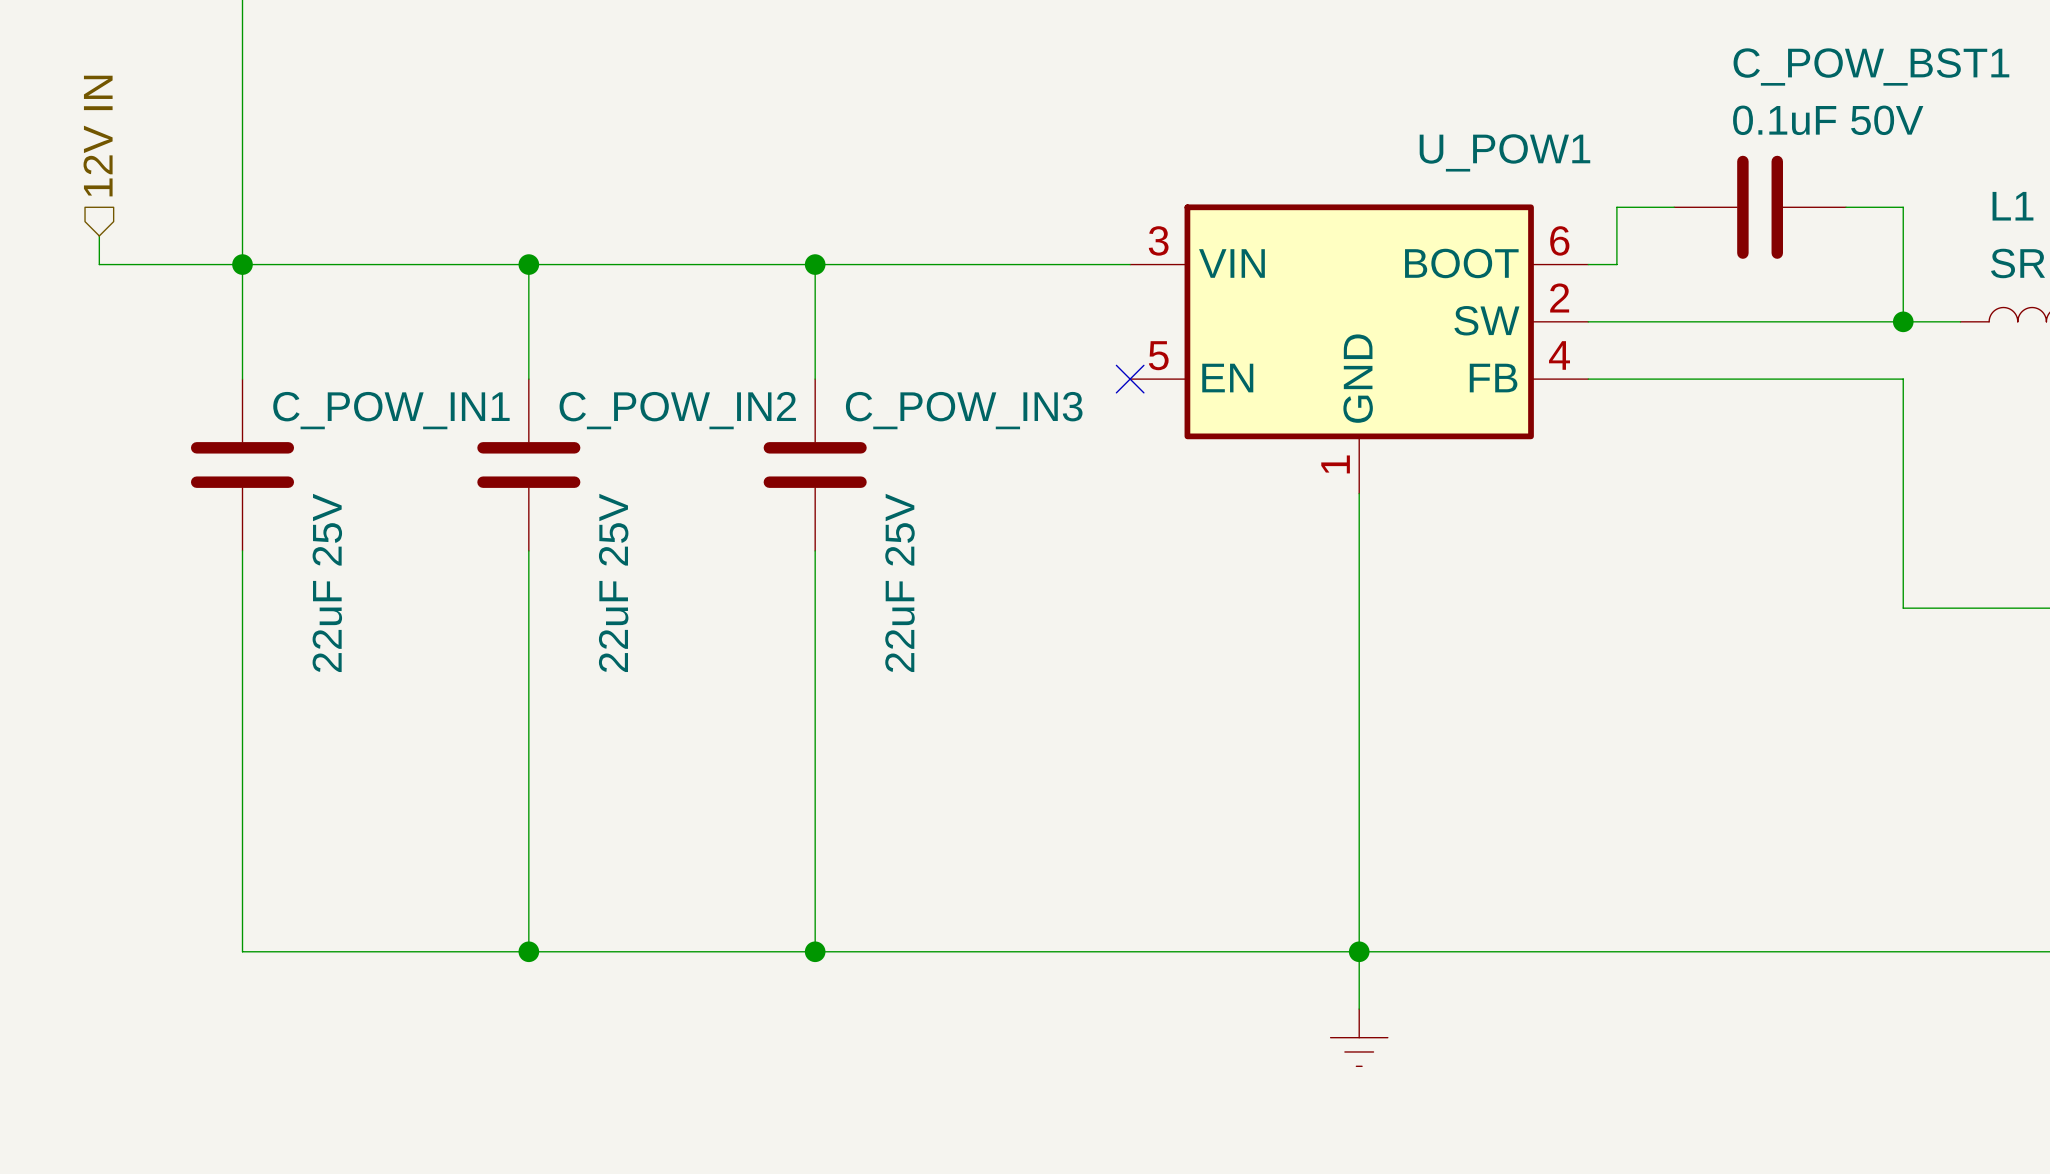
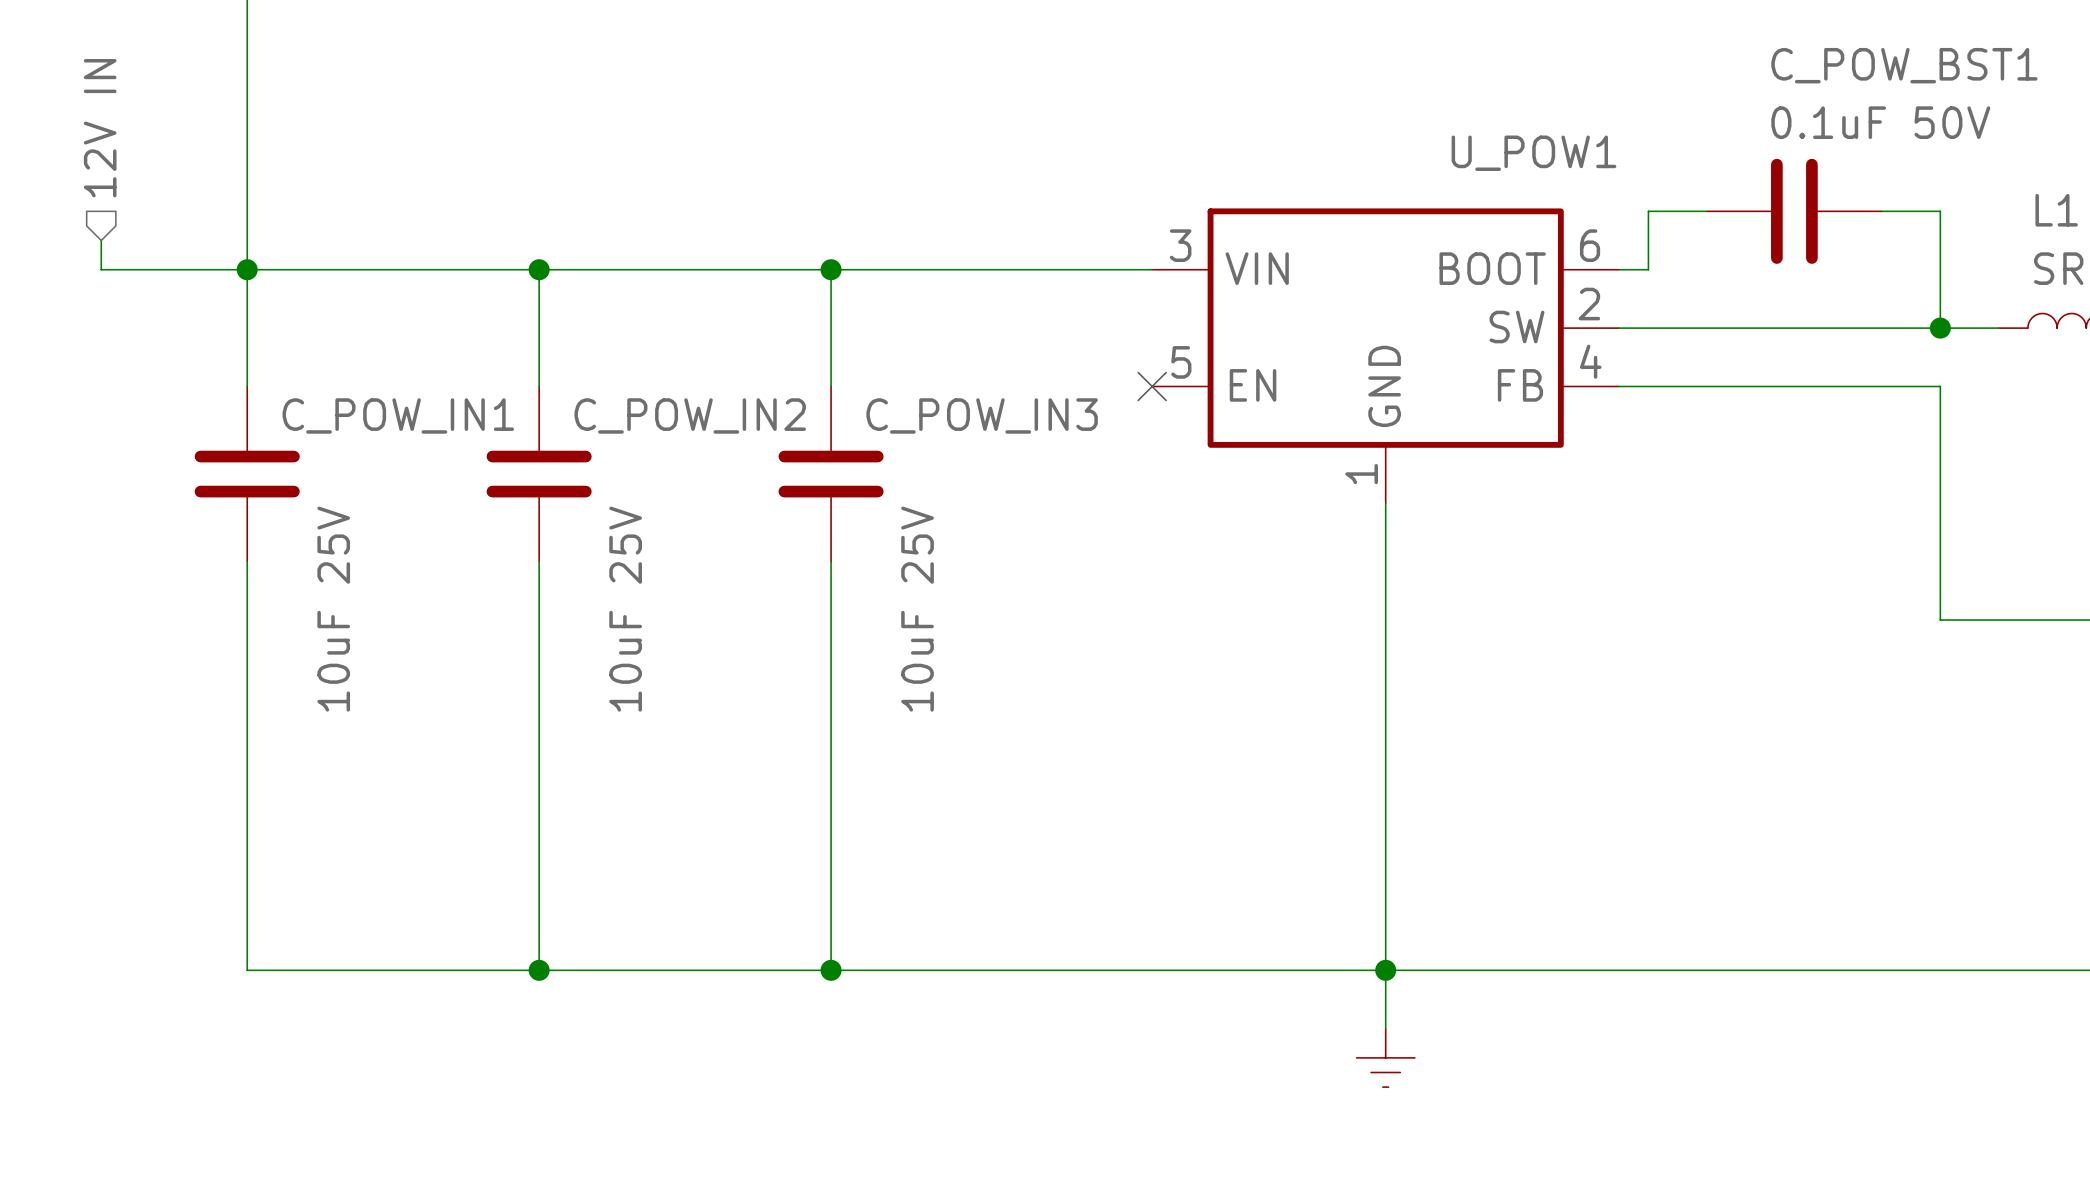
C_POW_IN1 value: 22uF 25V (327, 582) -> 10uF 25V (333, 609)
C_POW_IN2 value: 22uF 25V (613, 582) -> 10uF 25V (625, 609)
C_POW_IN3 value: 22uF 25V (899, 582) -> 10uF 25V (917, 609)

